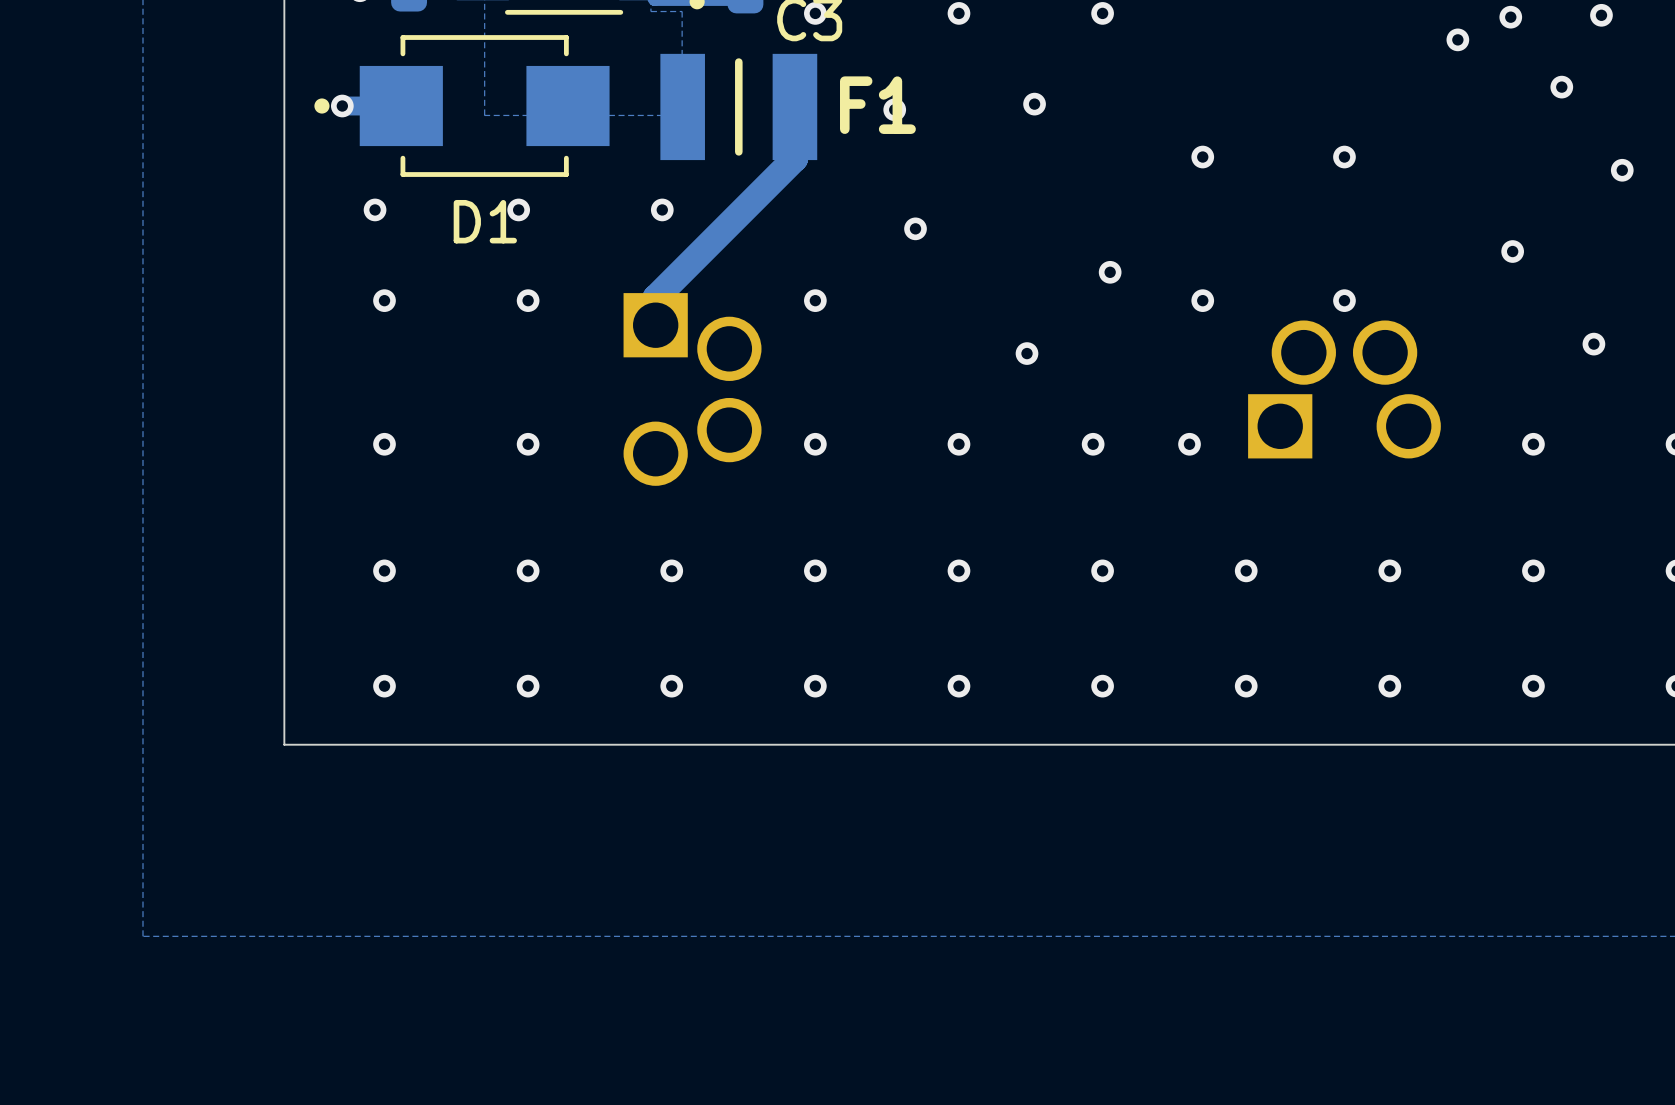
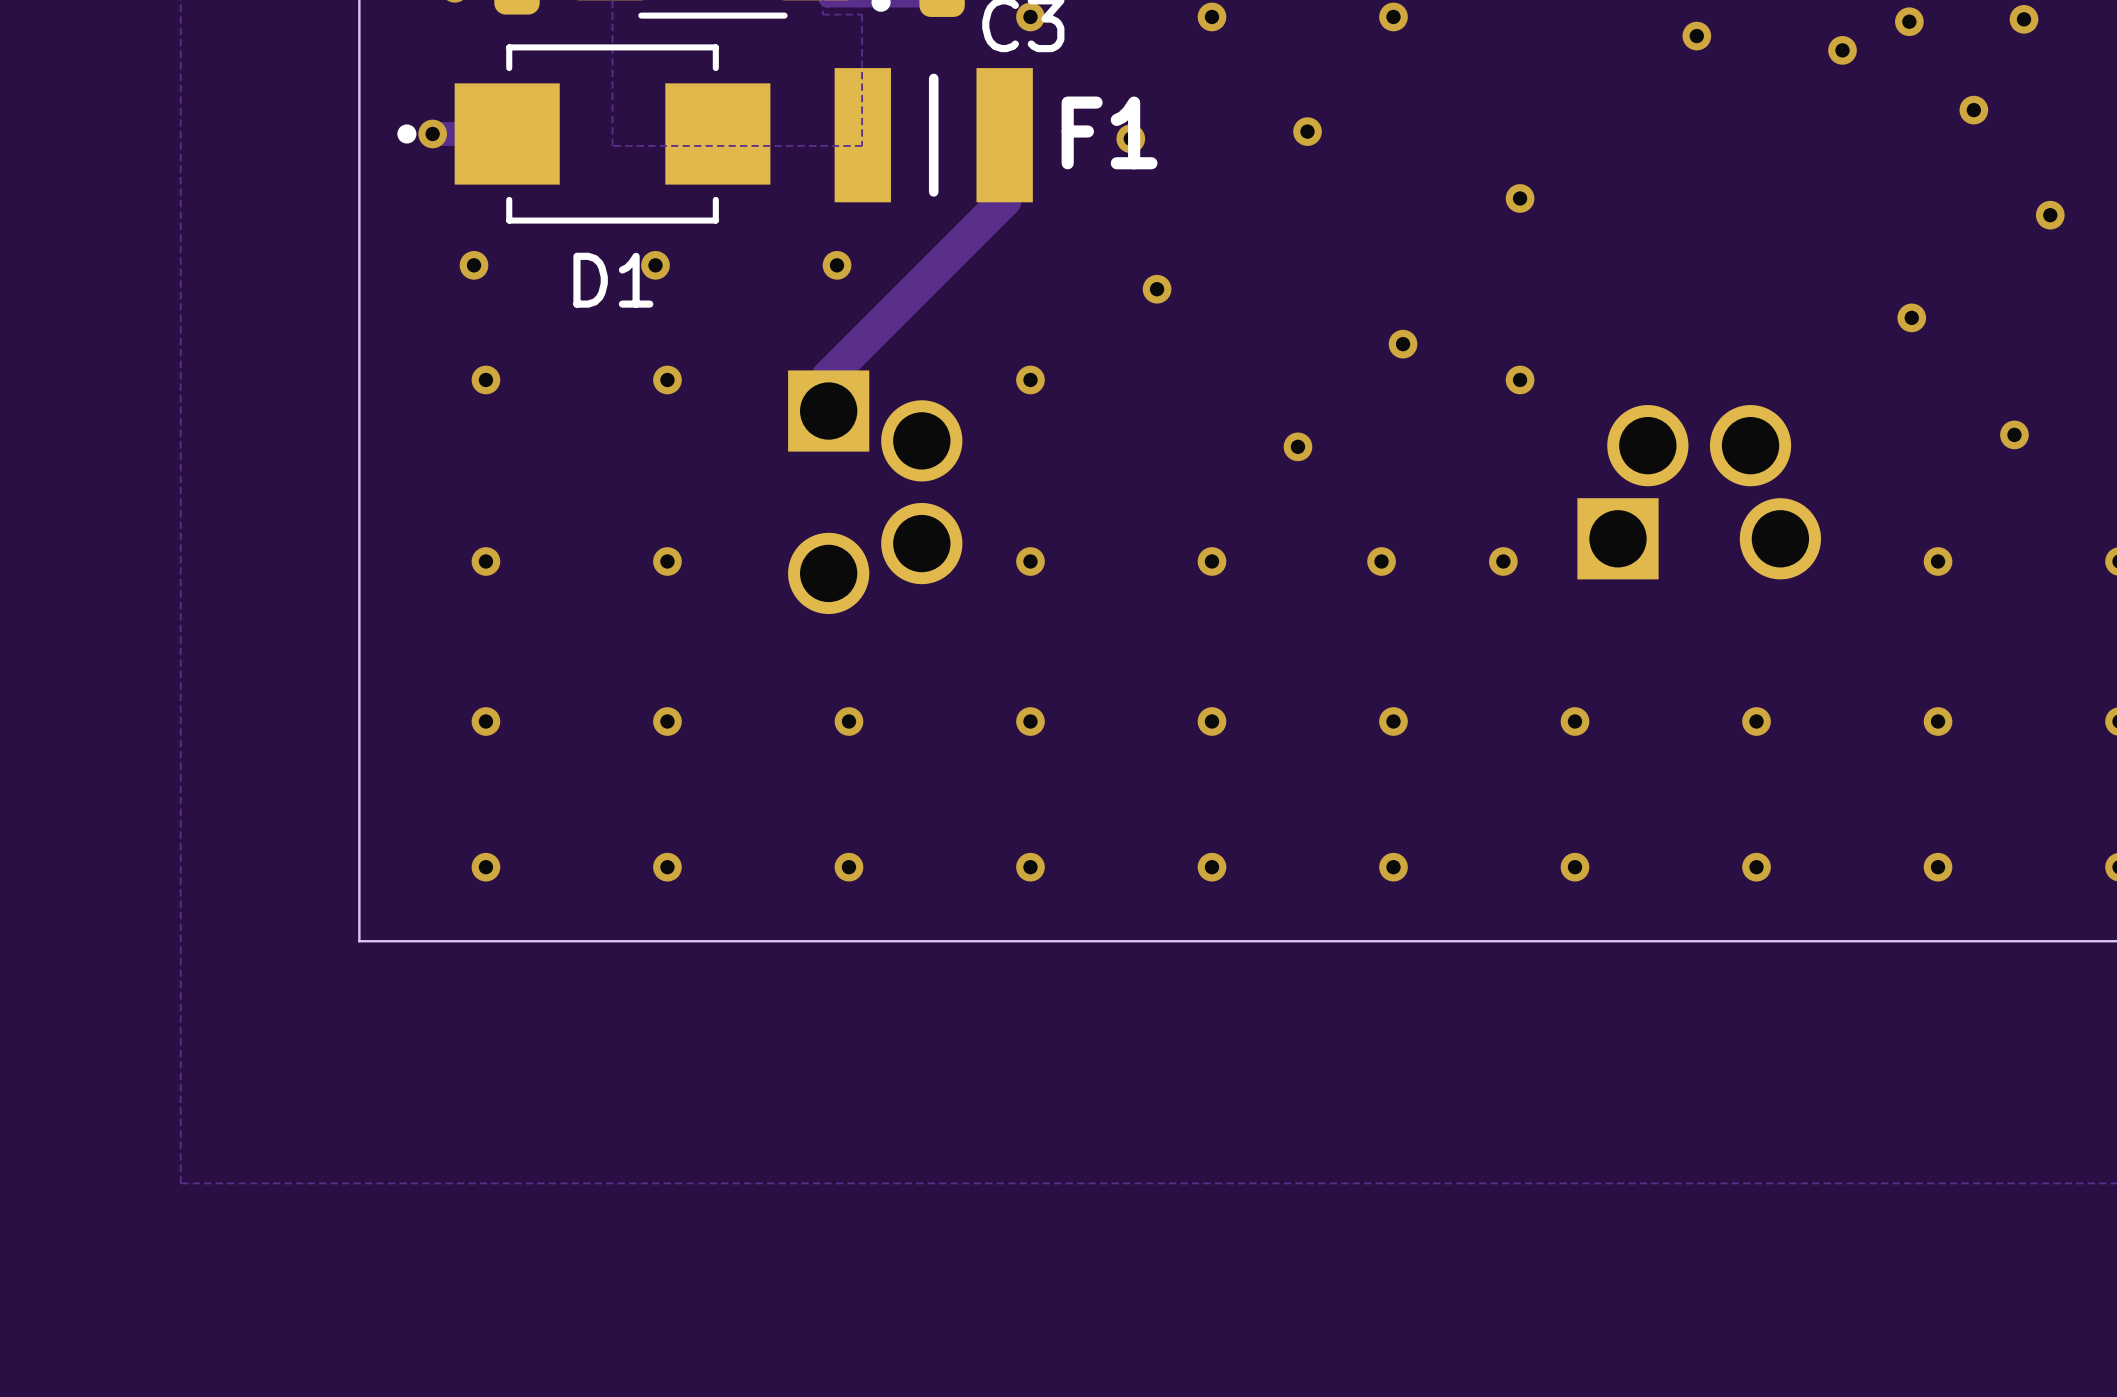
via position: (1344, 157) -> (1696, 36)
via: (1344, 300) -> none

